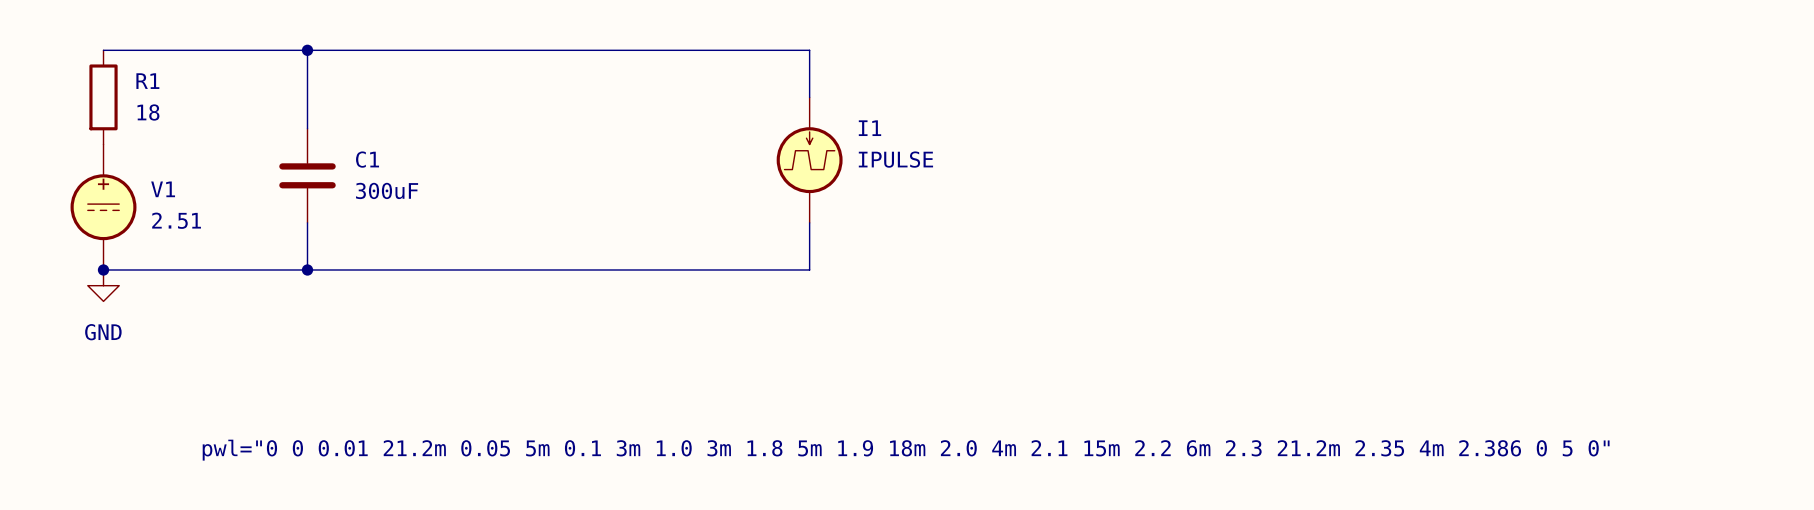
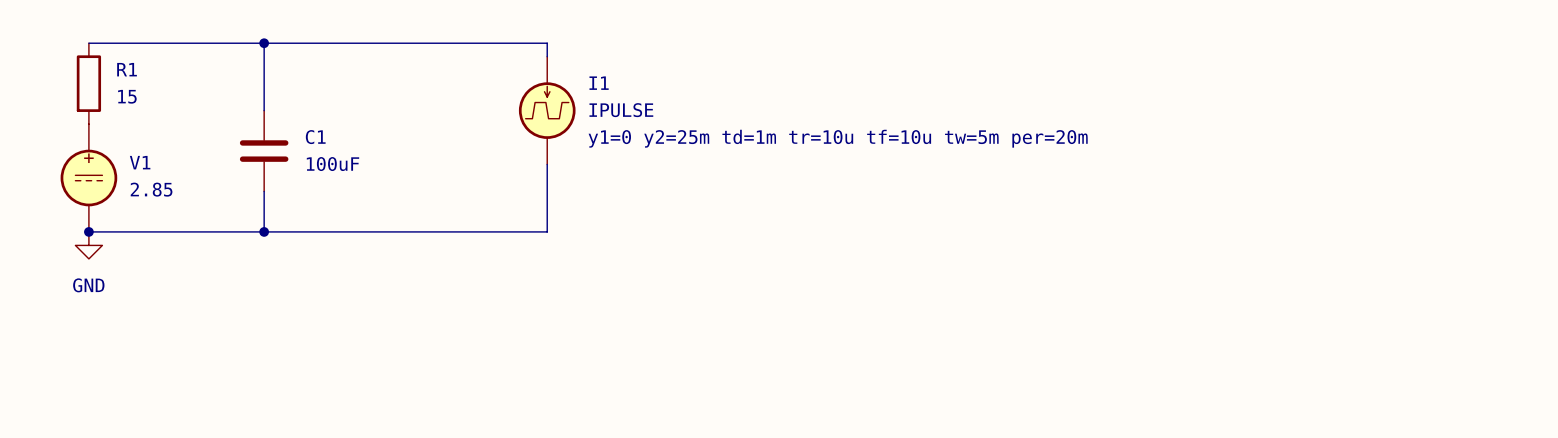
wire: (637, 50) (809, 50) (809, 97) -> (547, 43) (547, 56)
R1 value: 18 (148, 112) -> 15 (127, 96)
I1 position: (809, 160) -> (547, 110)
C1 value: 300uF (387, 190) -> 100uF (332, 164)
V1 value: 2.51 (176, 220) -> 2.85 (151, 189)
wire: (809, 222) (809, 269) (637, 269) -> (547, 164) (547, 231)
I1 text: pwl="0 0 0.01 21.2m 0.05 5m 0.1 3m 1.0 3m 1.8 5m 1.9 18m 2.0 4m 2.1 15m 2.2 6m 2.3 21.2m 2.35 4m 2.386 0 5 0" (906, 450) -> y1=0 y2=25m td=1m tr=10u tf=10u tw=5m per=20m (838, 138)

